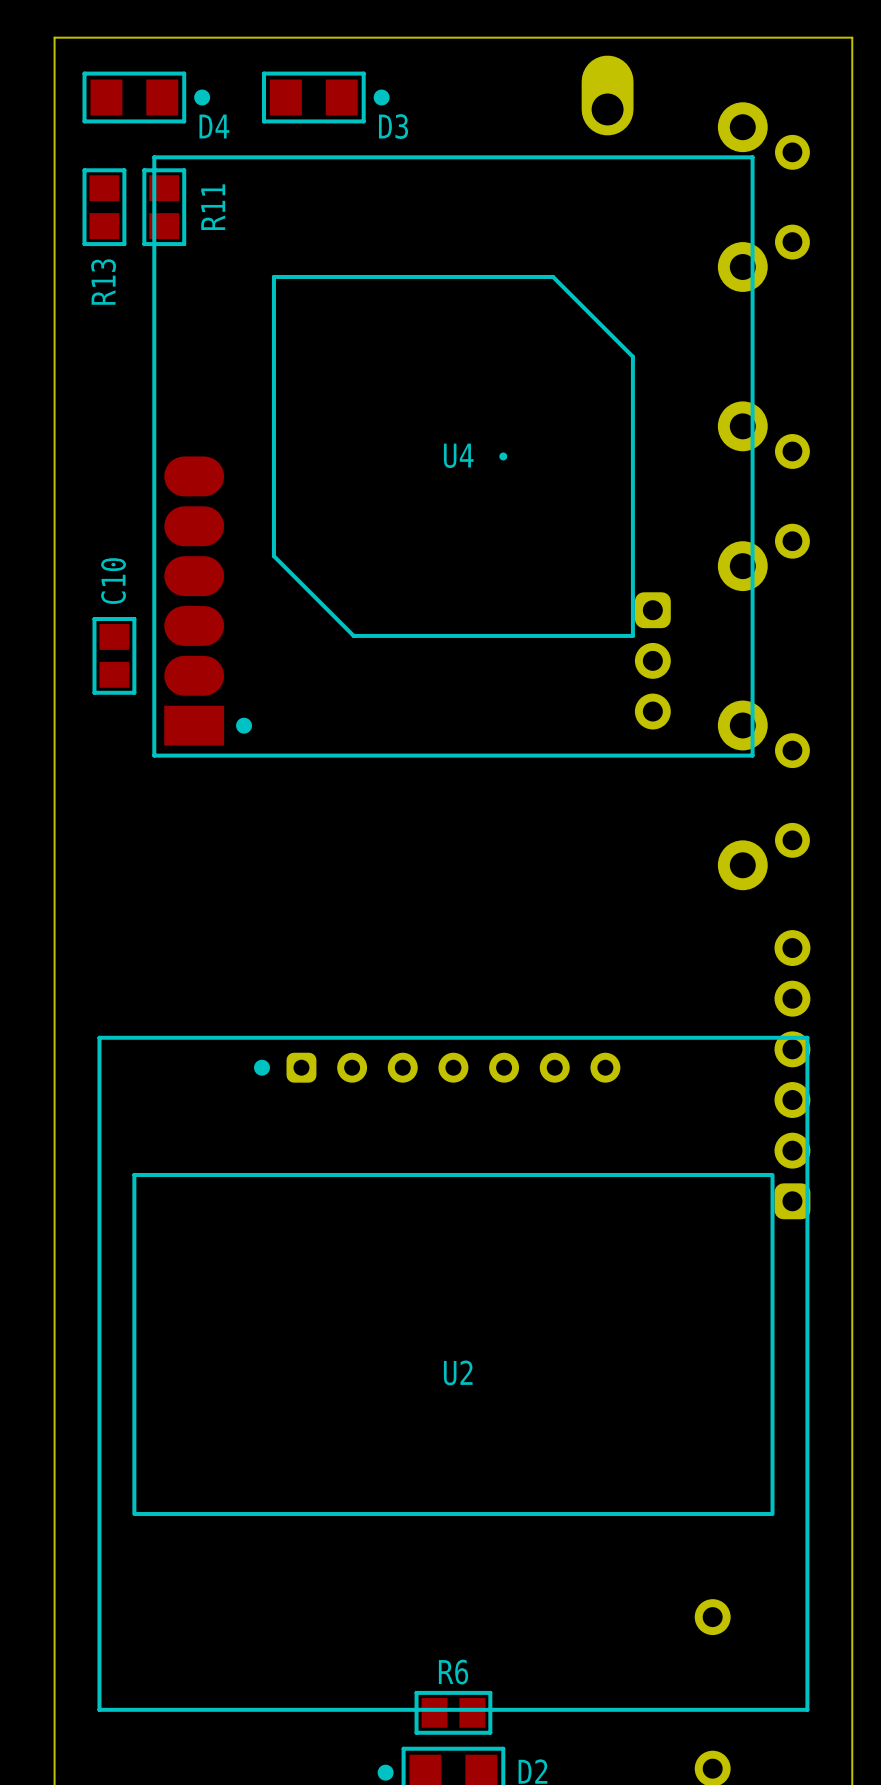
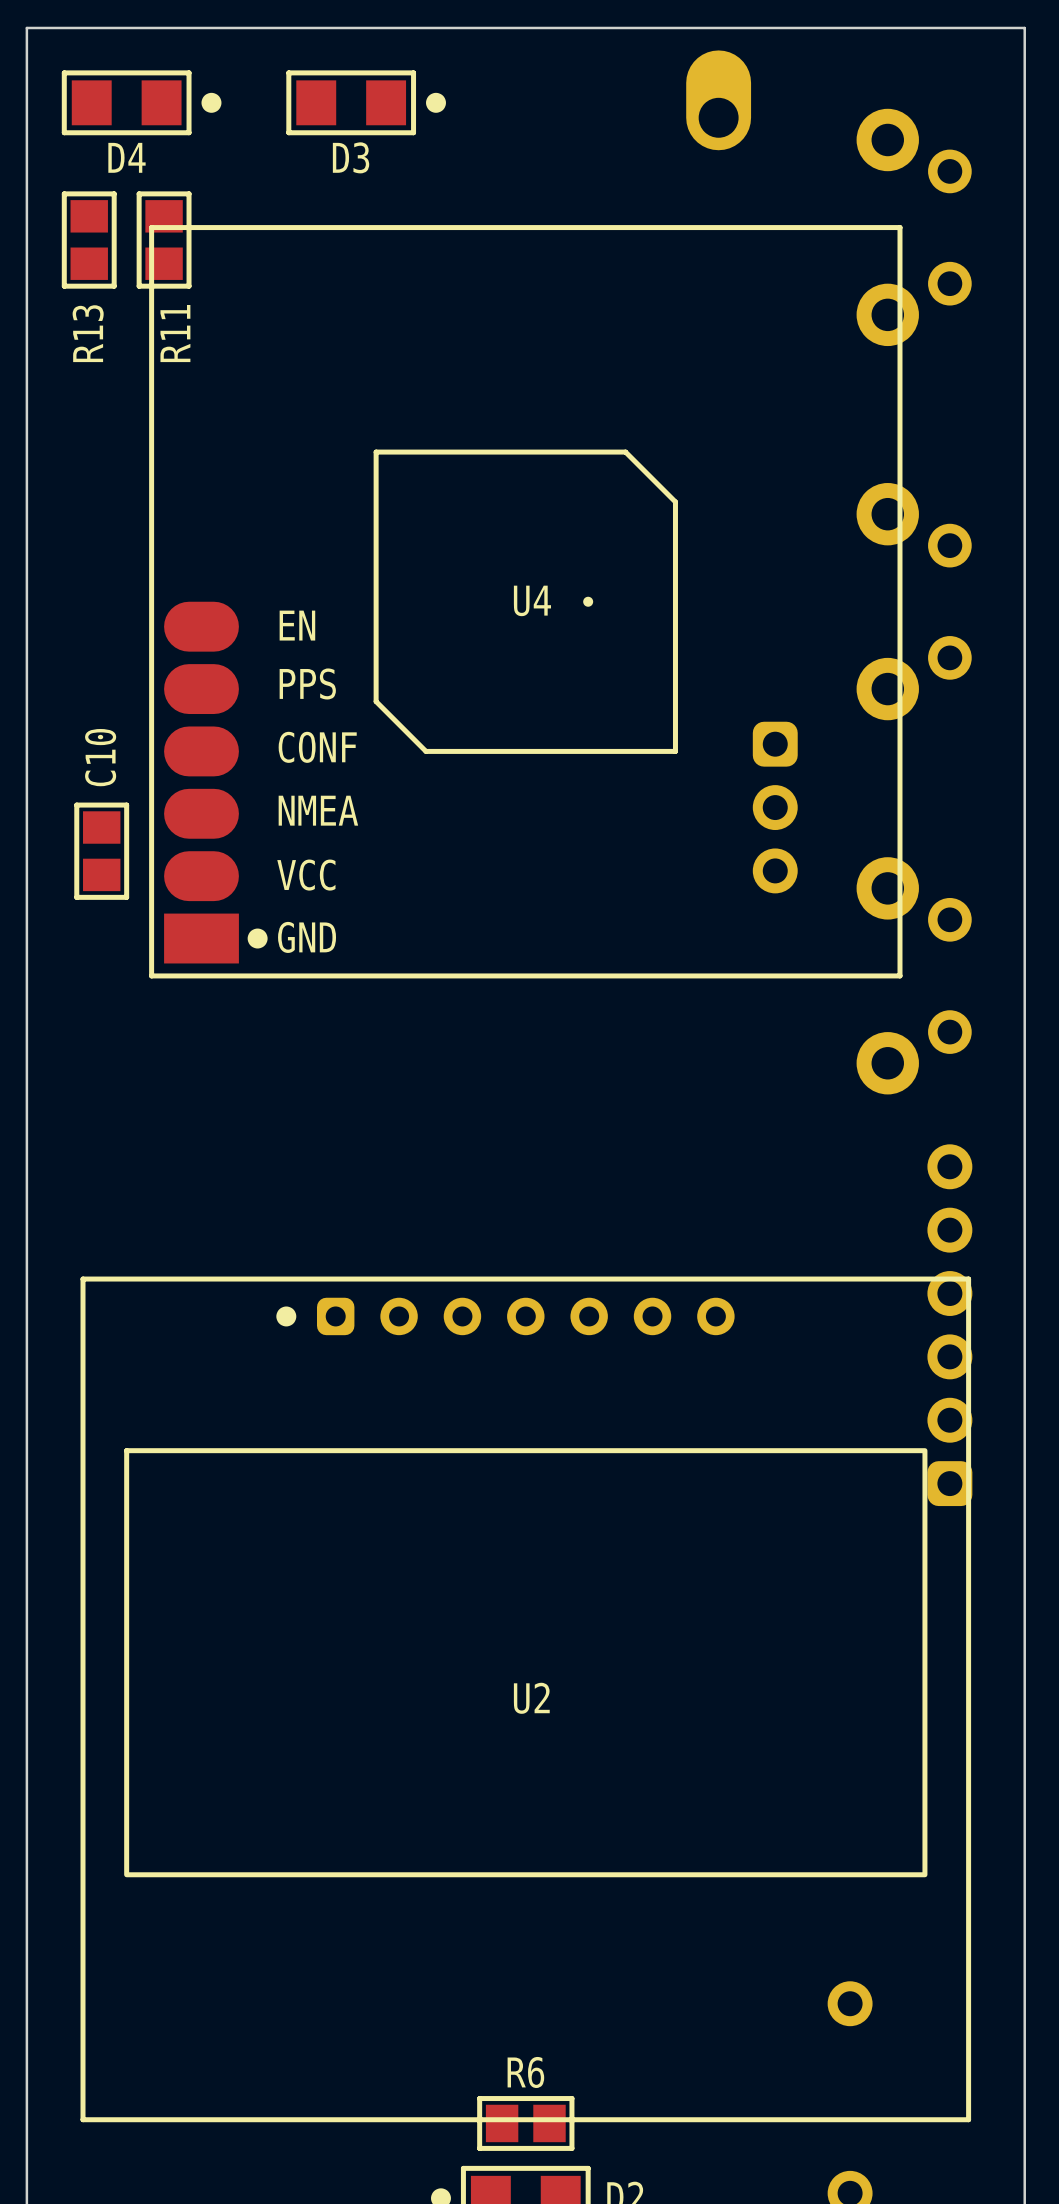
D4 name position: D4 (214, 126) -> D4 (126, 157)
D3 name position: D3 (393, 126) -> D3 (351, 157)
U4 footprint: [152, 155, 755, 758] -> [149, 225, 903, 979]
R11 name position: R11 (213, 207) -> R11 (175, 333)
C10 position: (114, 655) -> (101, 851)

